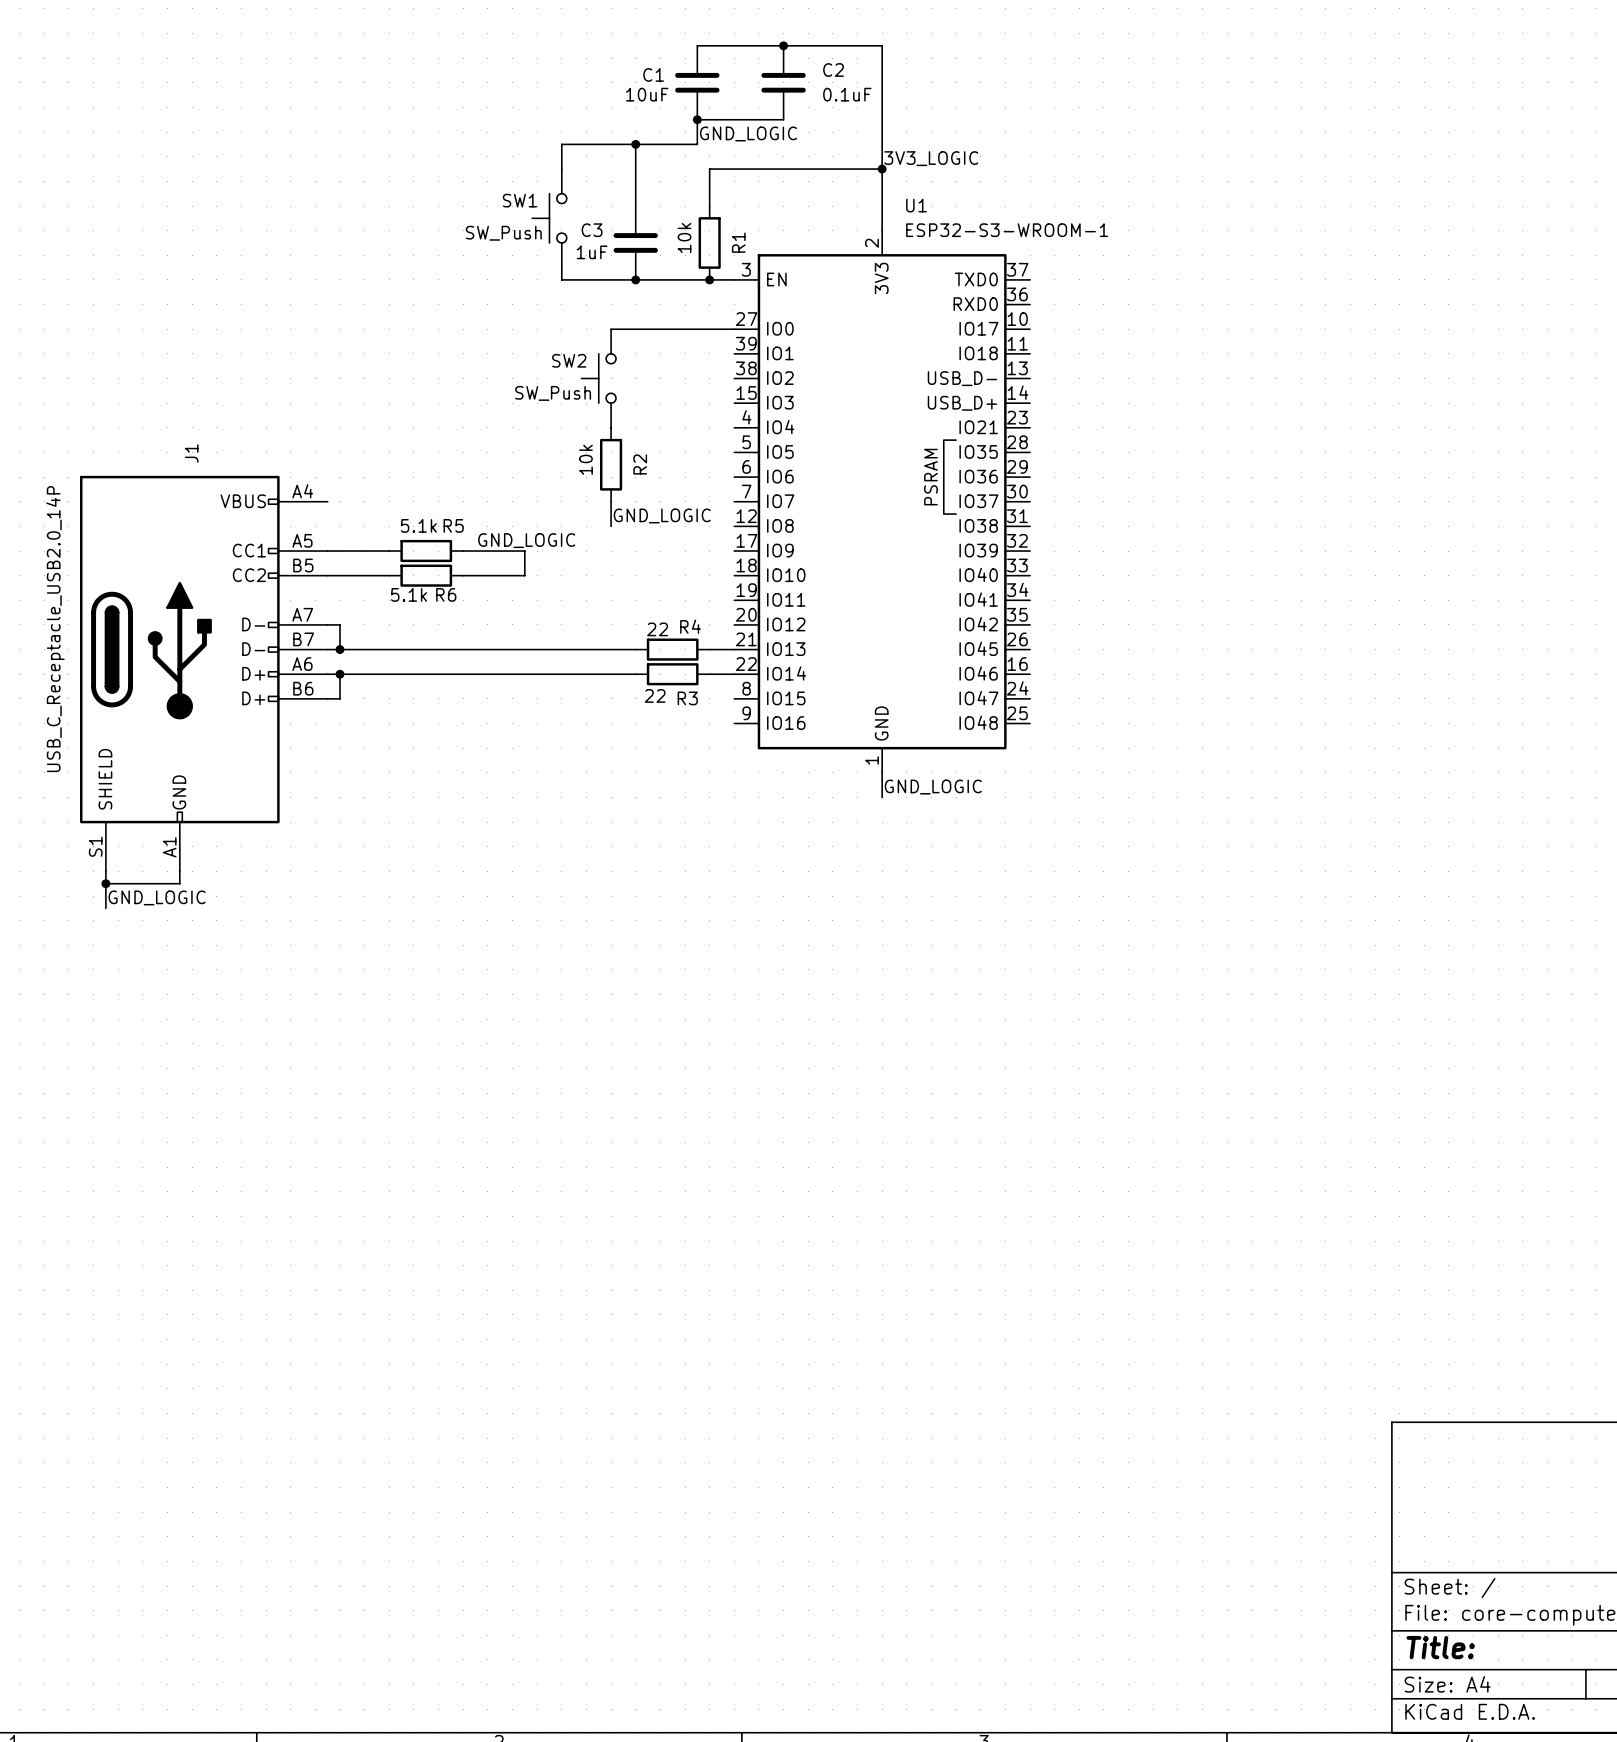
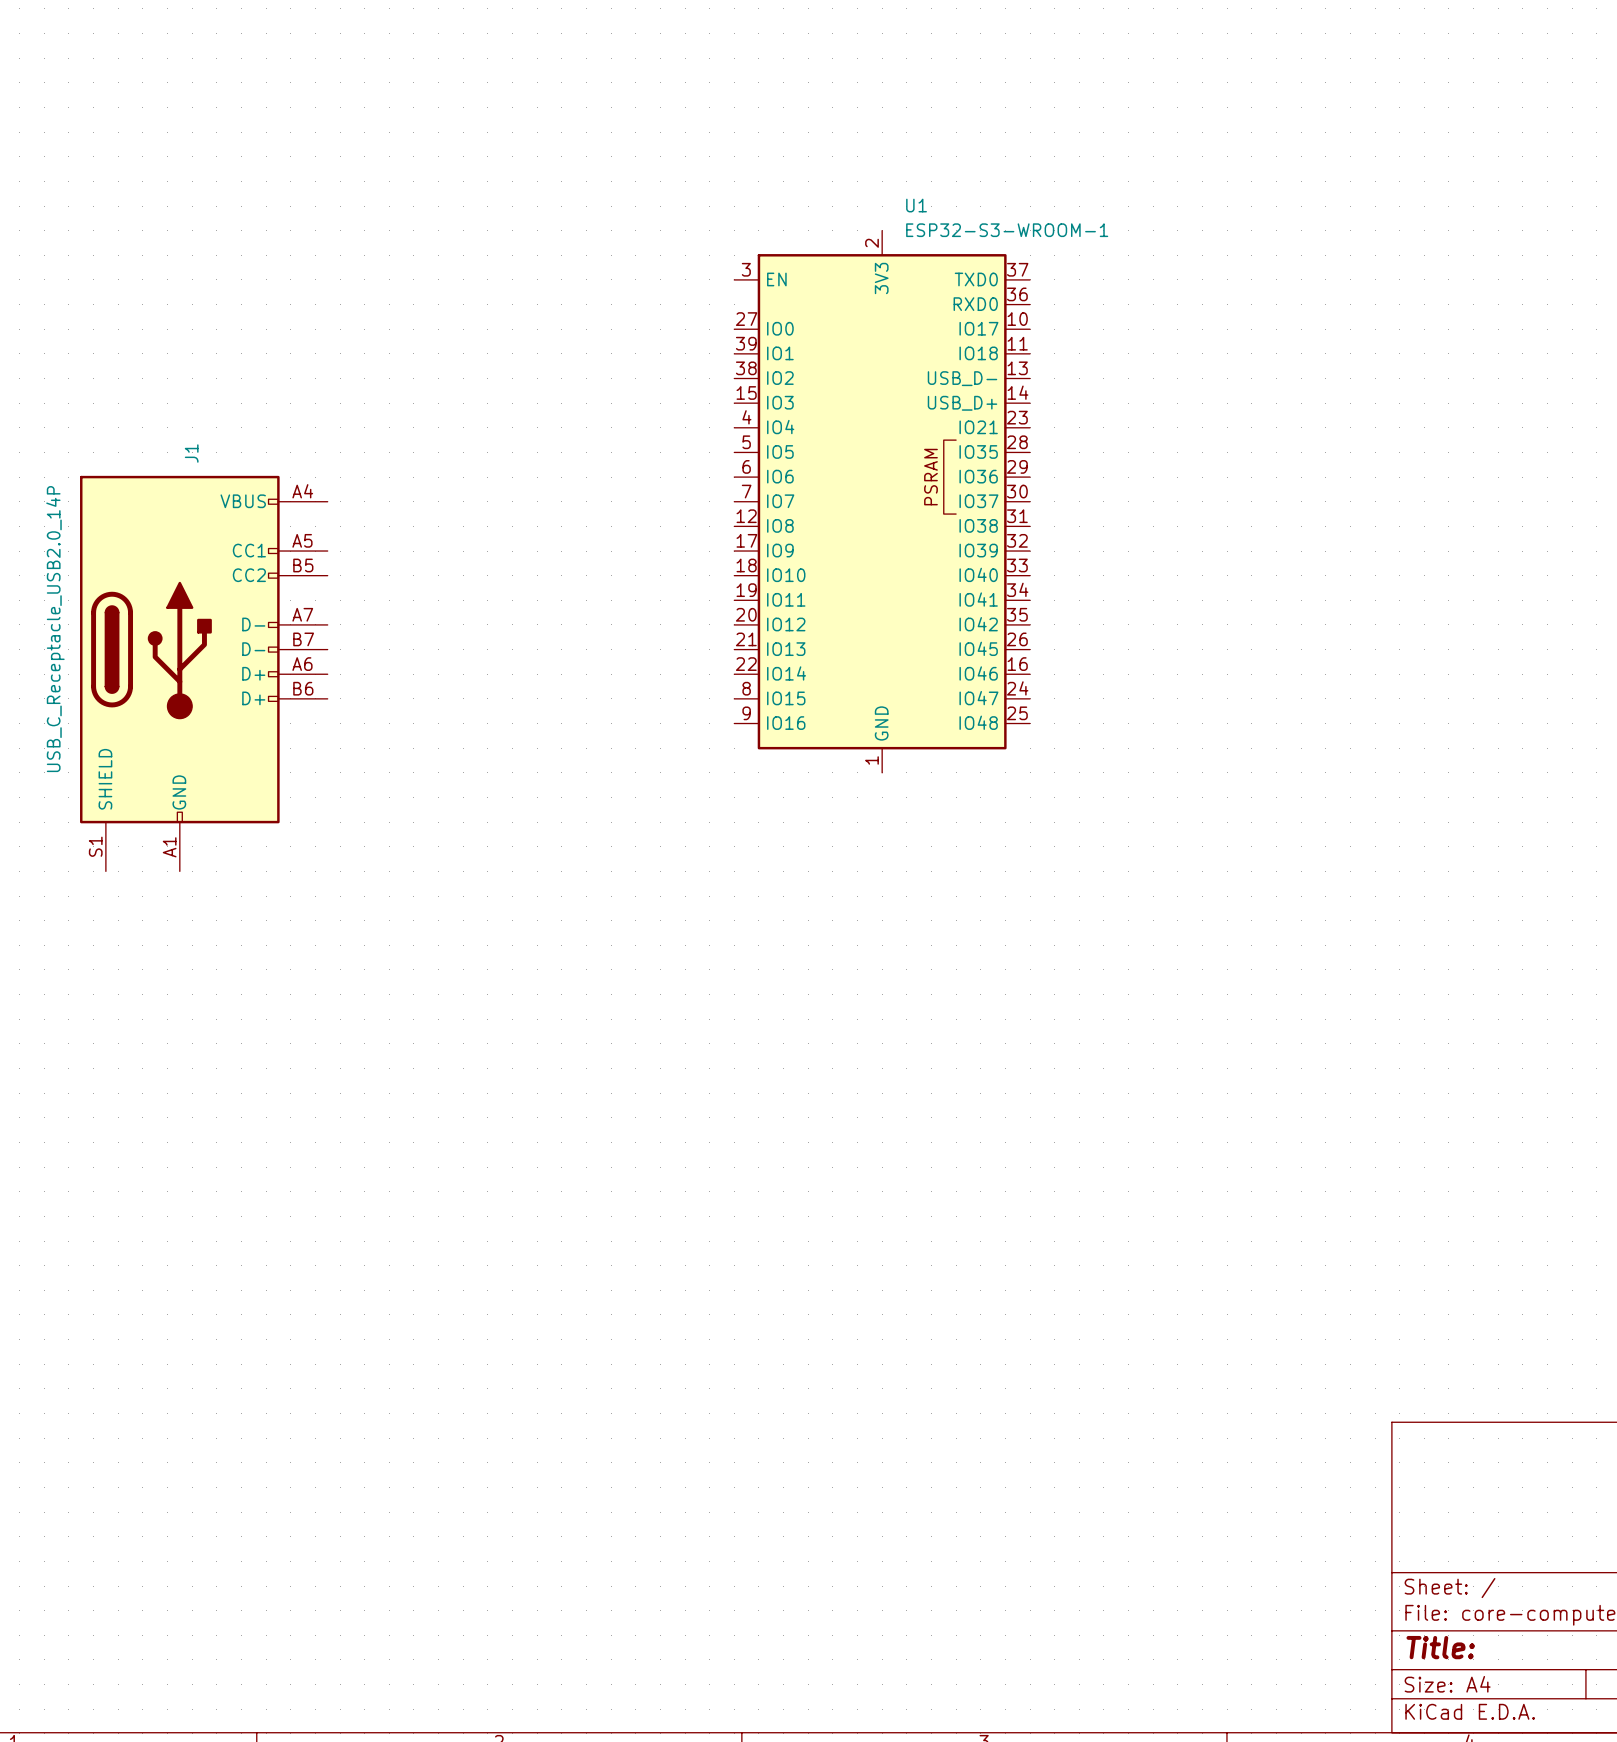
wire: (697, 45) (882, 45) (882, 230) -> none
junction: (783, 45) -> none
C1: 10uF (697, 82) -> none
C2: 0.1uF (783, 82) -> none
junction: (697, 119) -> none
wire: (783, 119) (697, 119) (697, 144) (561, 144) (561, 169) -> none
label: GND_LOGIC (748, 133) -> none
wire: (635, 144) (635, 206) -> none
junction: (635, 144) -> none
label: 3V3_LOGIC (931, 158) -> none
wire: (882, 169) (709, 169) (709, 206) -> none
junction: (882, 169) -> none
SW1: SW_Push (549, 218) -> none
C3: 1uF (635, 242) -> none
R1: 10k (709, 242) -> none
wire: (561, 267) (561, 279) (734, 279) -> none
junction: (635, 279) -> none
junction: (709, 279) -> none
wire: (611, 329) (734, 329) -> none
SW2: SW_Push (598, 378) -> none
R2: 10k (611, 464) -> none
wire: (611, 501) (611, 526) -> none
label: GND_LOGIC (662, 515) -> none
label: GND_LOGIC (526, 540) -> none
wire: (327, 551) (389, 551) -> none
R5: 5.1k (426, 551) -> none
wire: (463, 551) (524, 551) (524, 575) (463, 575) -> none
wire: (327, 575) (389, 575) -> none
R6: 5.1k (426, 575) -> none
wire: (327, 624) (340, 624) (340, 649) -> none
wire: (327, 649) (635, 649) -> none
junction: (340, 649) -> none
R4: 22 (672, 649) -> none
wire: (709, 649) (734, 649) -> none
wire: (327, 674) (635, 674) -> none
wire: (340, 674) (340, 698) (327, 698) -> none
junction: (340, 674) -> none
R3: 22 (672, 674) -> none
wire: (709, 674) (734, 674) -> none
wire: (882, 772) (882, 797) -> none
label: GND_LOGIC (933, 787) -> none
wire: (105, 871) (105, 908) -> none
wire: (179, 871) (179, 883) (105, 883) -> none
junction: (105, 883) -> none
label: GND_LOGIC (157, 897) -> none

